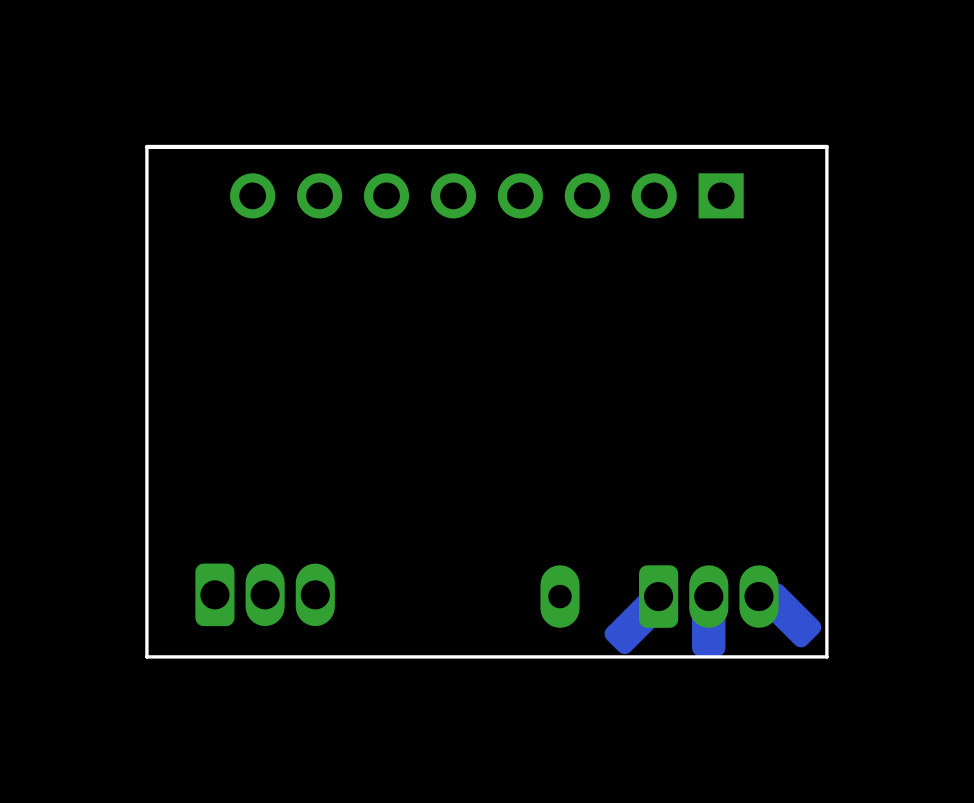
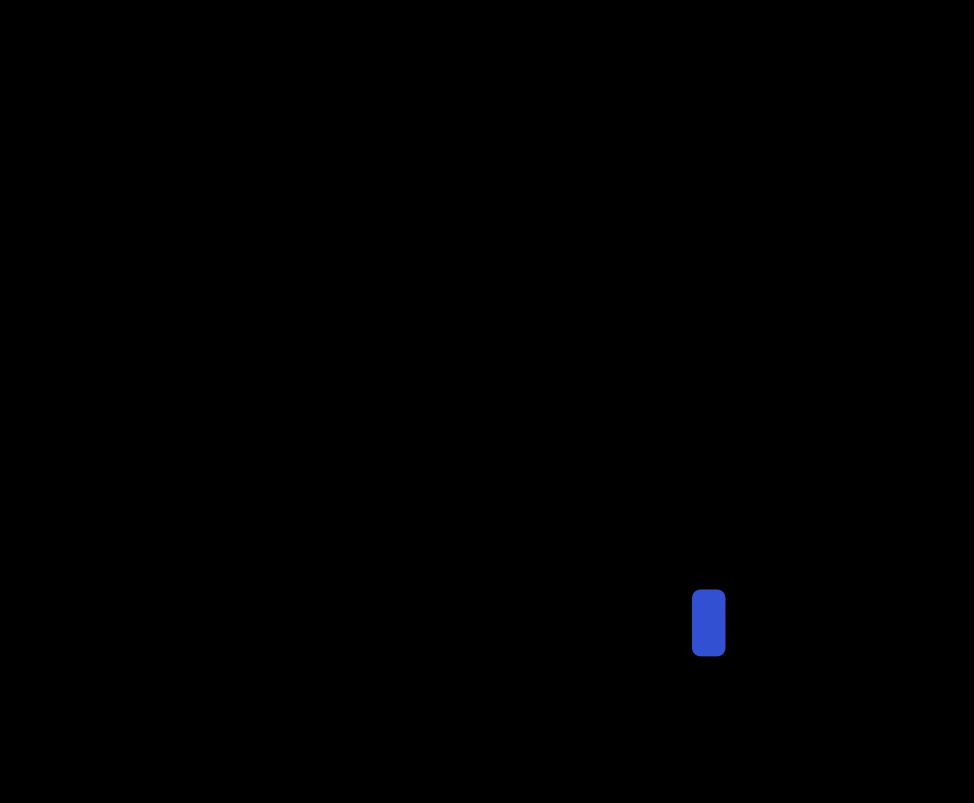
board edge: (826, 146) (826, 656) (146, 656) (146, 146) (826, 146) -> none
part: (486, 195) -> none
part: (265, 594) -> none
part: (560, 596) -> none
part: (708, 596) -> none
part: (789, 615) -> none
part: (636, 622) -> none

